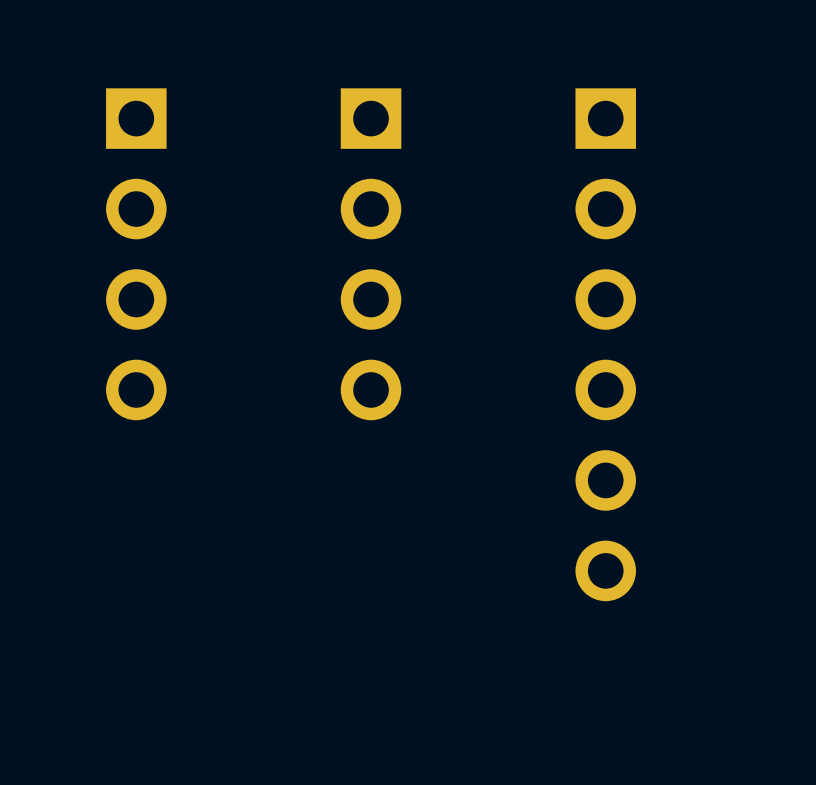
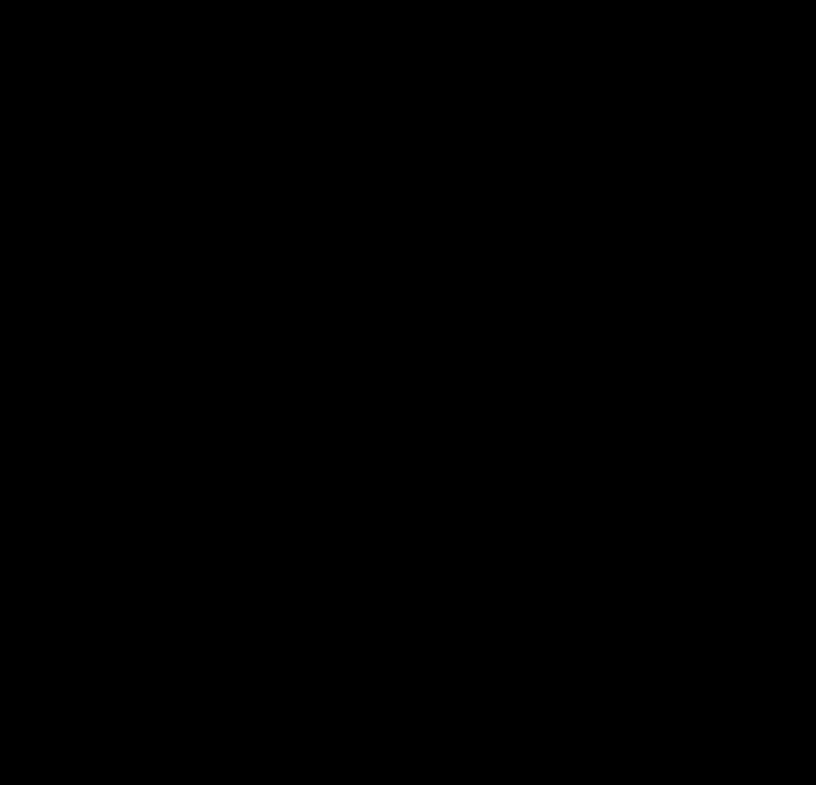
part: (136, 254) -> none
part: (371, 254) -> none
part: (605, 344) -> none

